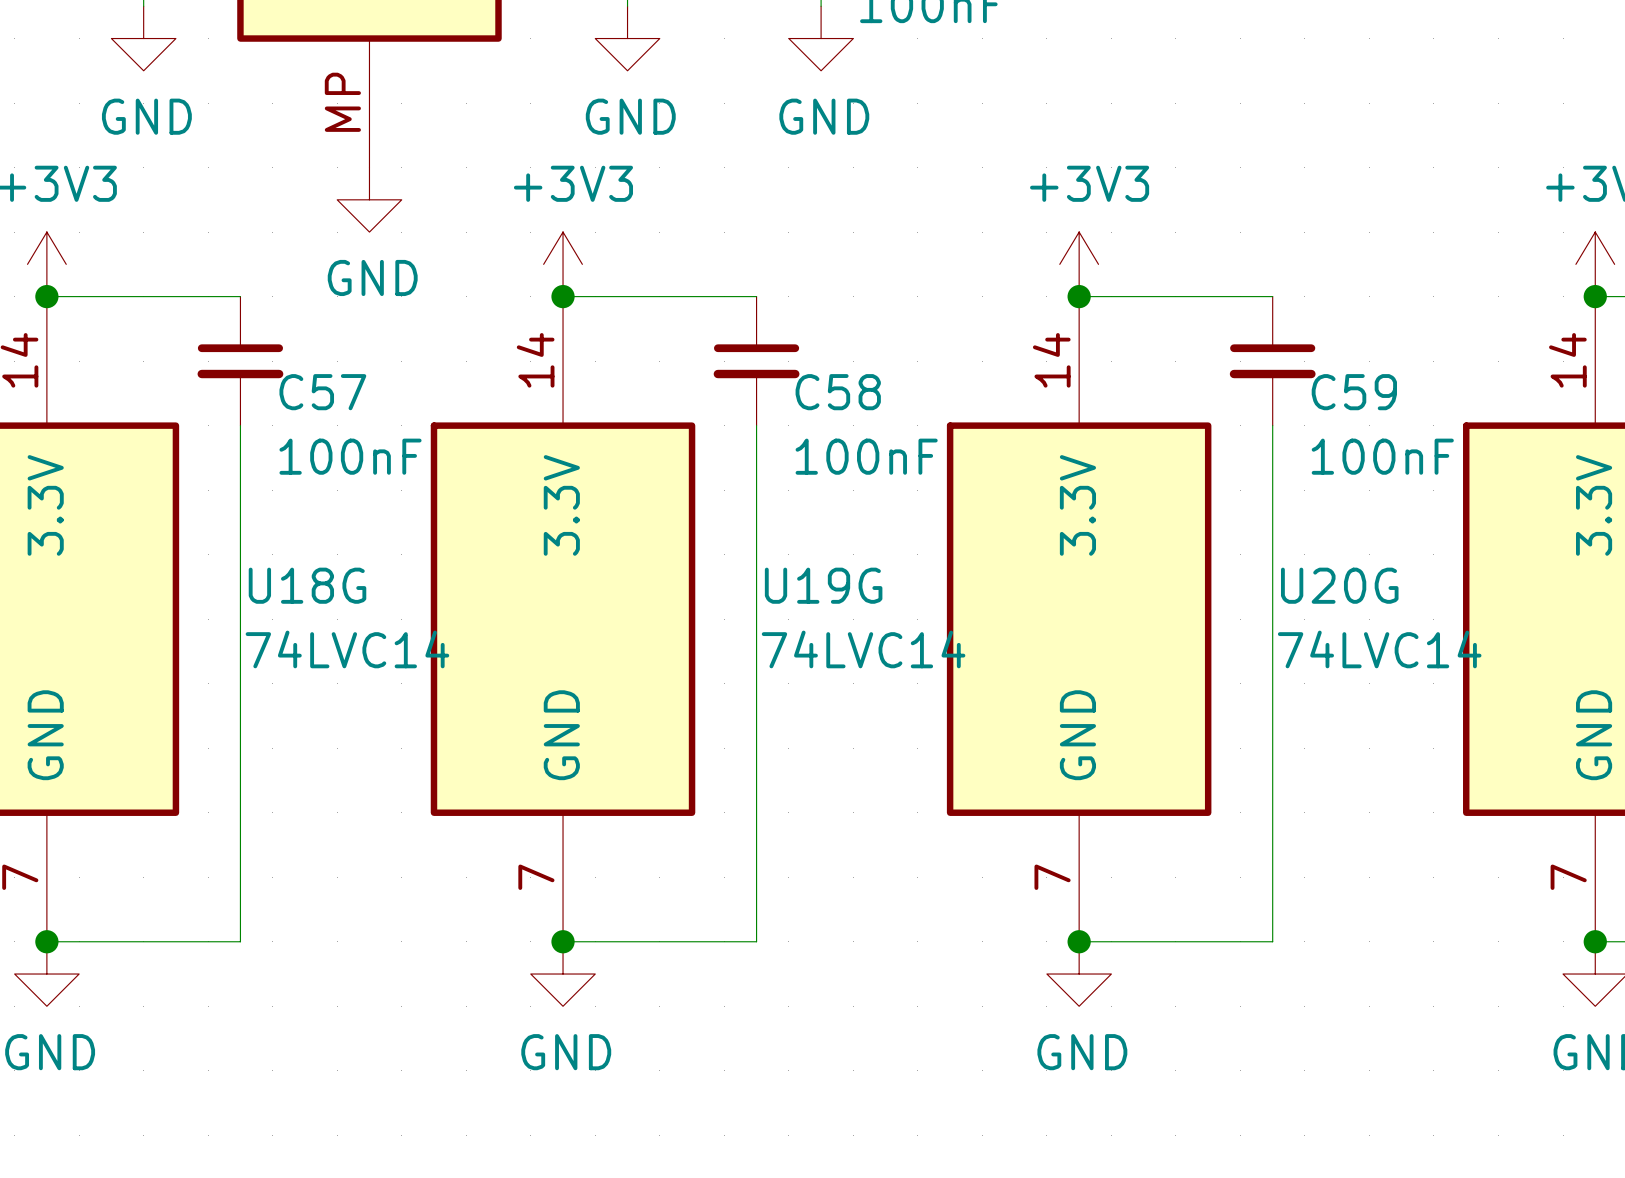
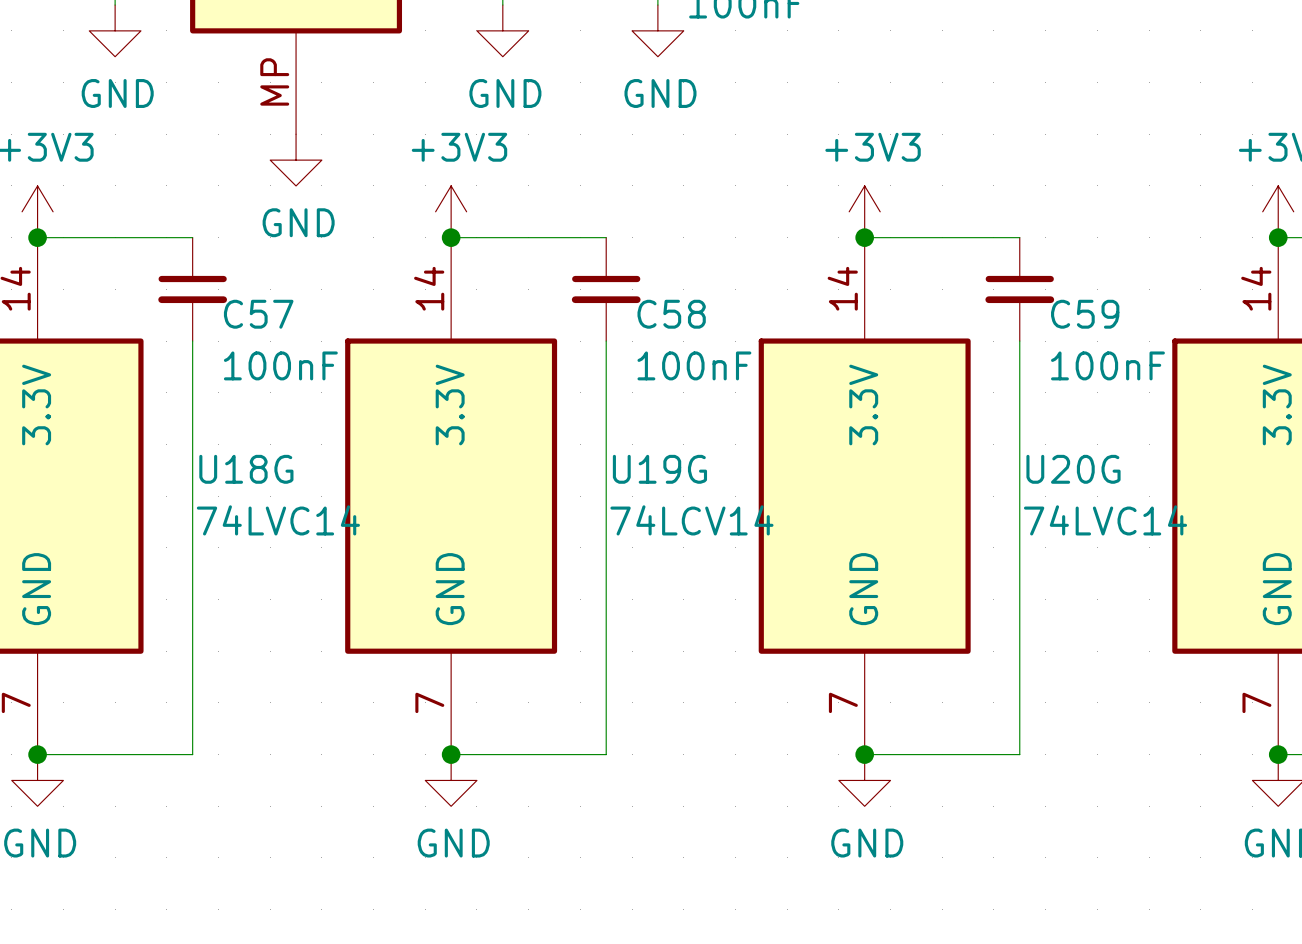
U19G value: 74LVC14 (863, 649) -> 74LCV14 (691, 520)

